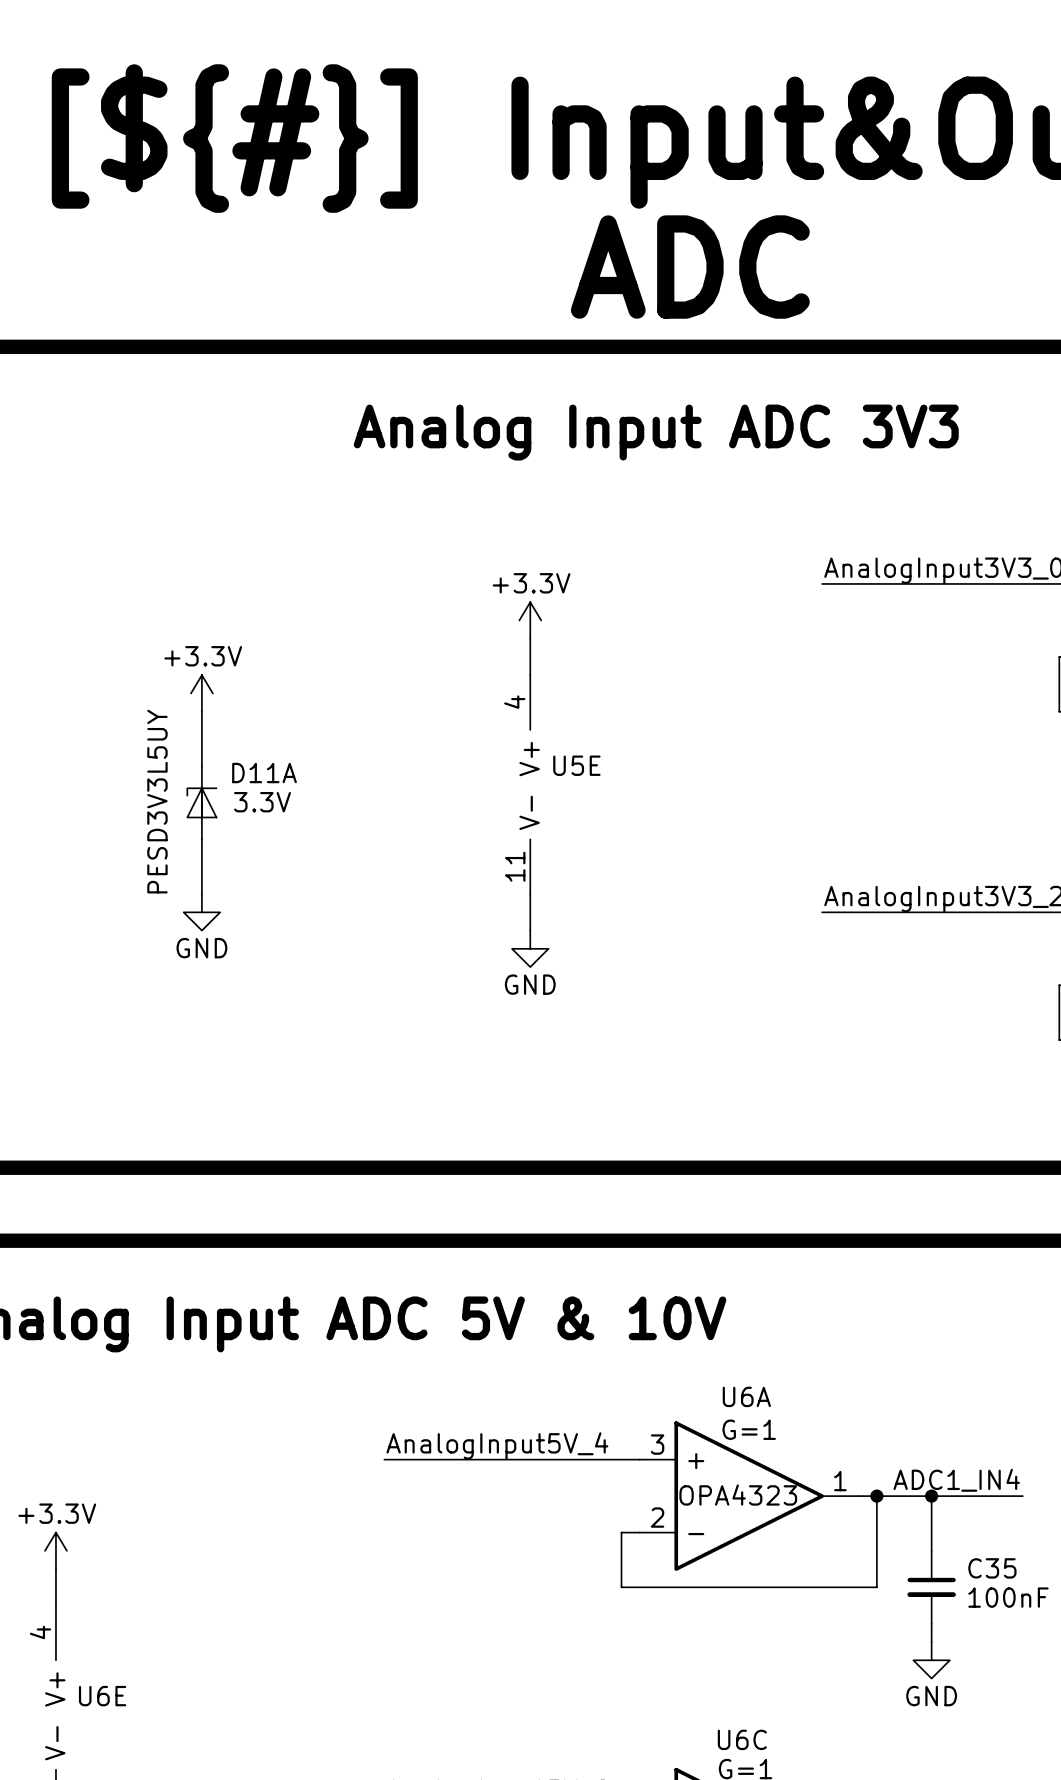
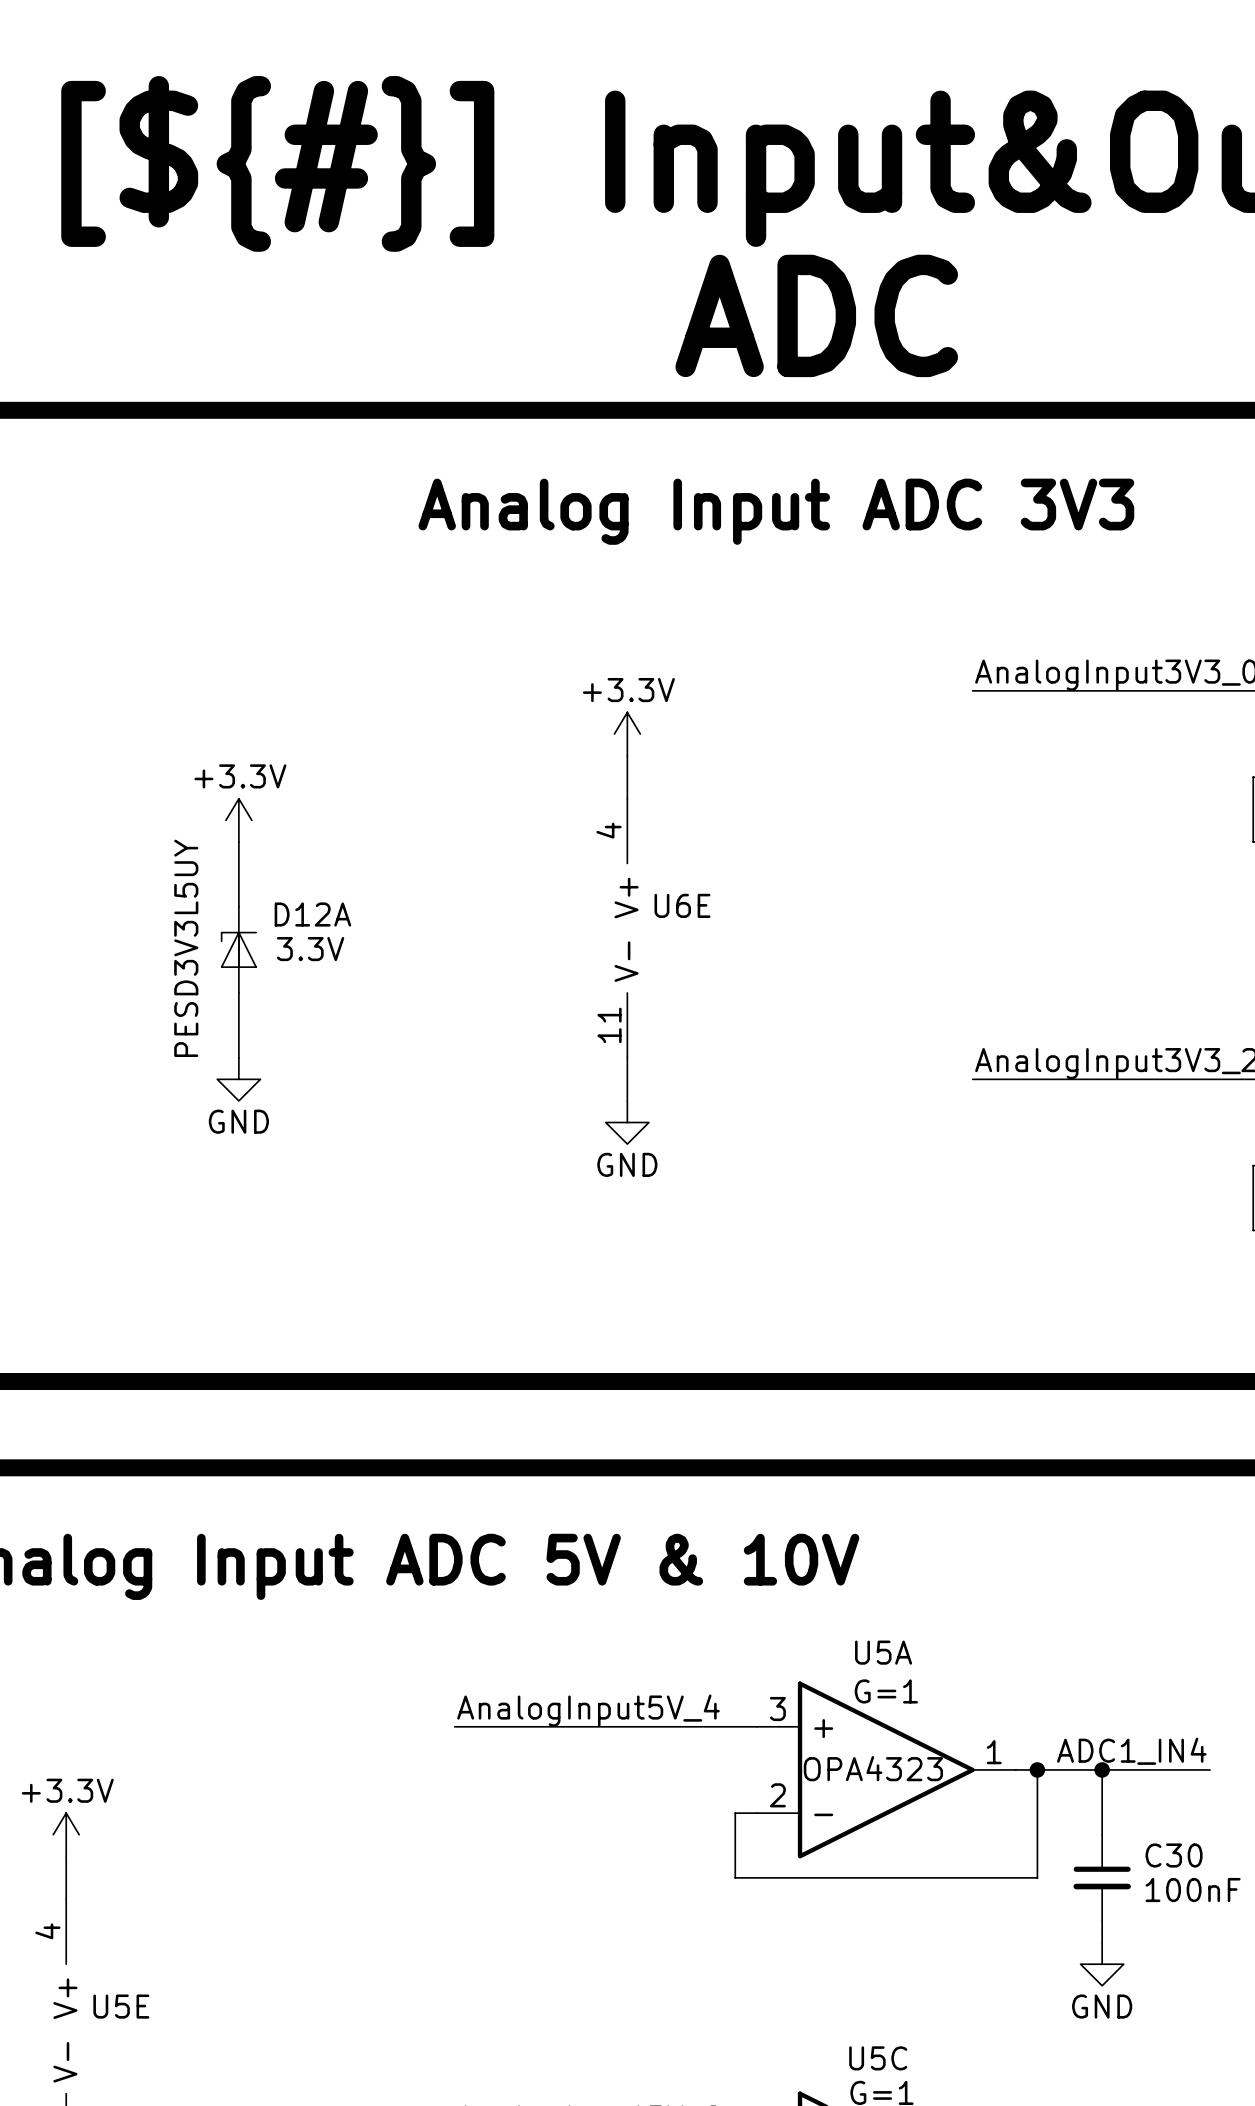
U5E name: U5E (576, 765) -> U6E (682, 905)
D11A name: D11A (264, 773) -> D12A (312, 914)
U6A name: U6A (746, 1396) -> U5A (883, 1652)
C35 name: C35 (992, 1568) -> C30 (1174, 1855)
U6E name: U6E (102, 1696) -> U5E (121, 2006)
U6C name: U6C (742, 1739) -> U5C (878, 2058)

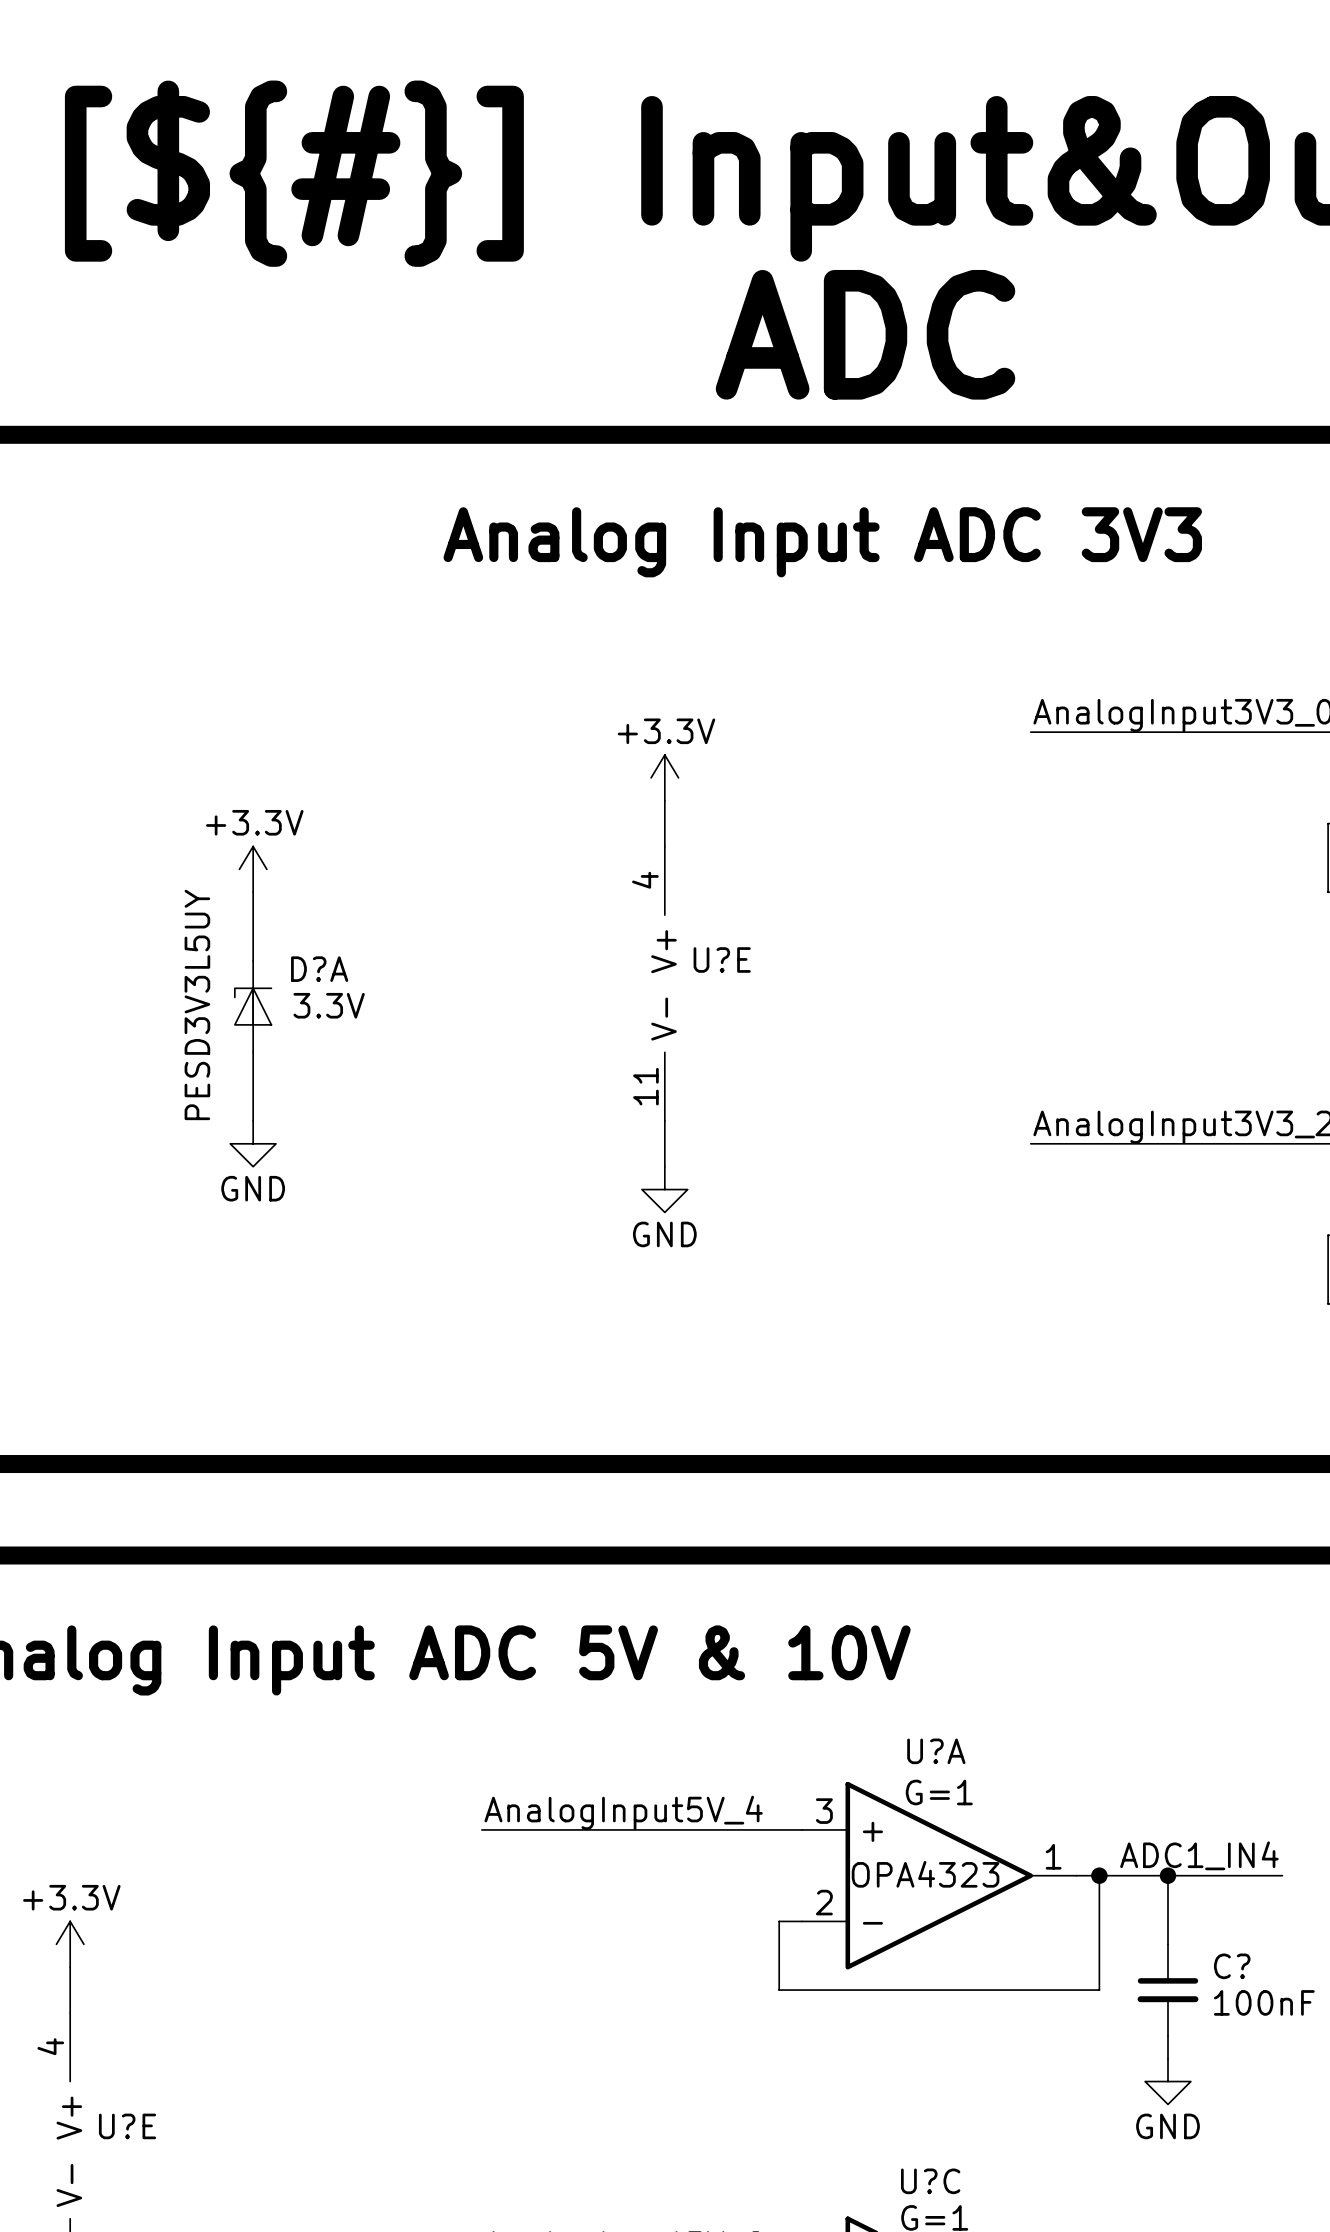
U6E name: U6E (682, 905) -> U?E (722, 959)
D12A name: D12A (312, 914) -> D?A (319, 969)
U5A name: U5A (883, 1652) -> U?A (936, 1751)
C30 name: C30 (1174, 1855) -> C? (1232, 1966)
U5E name: U5E (121, 2006) -> U?E (127, 2126)
U5C name: U5C (878, 2058) -> U?C (930, 2181)

